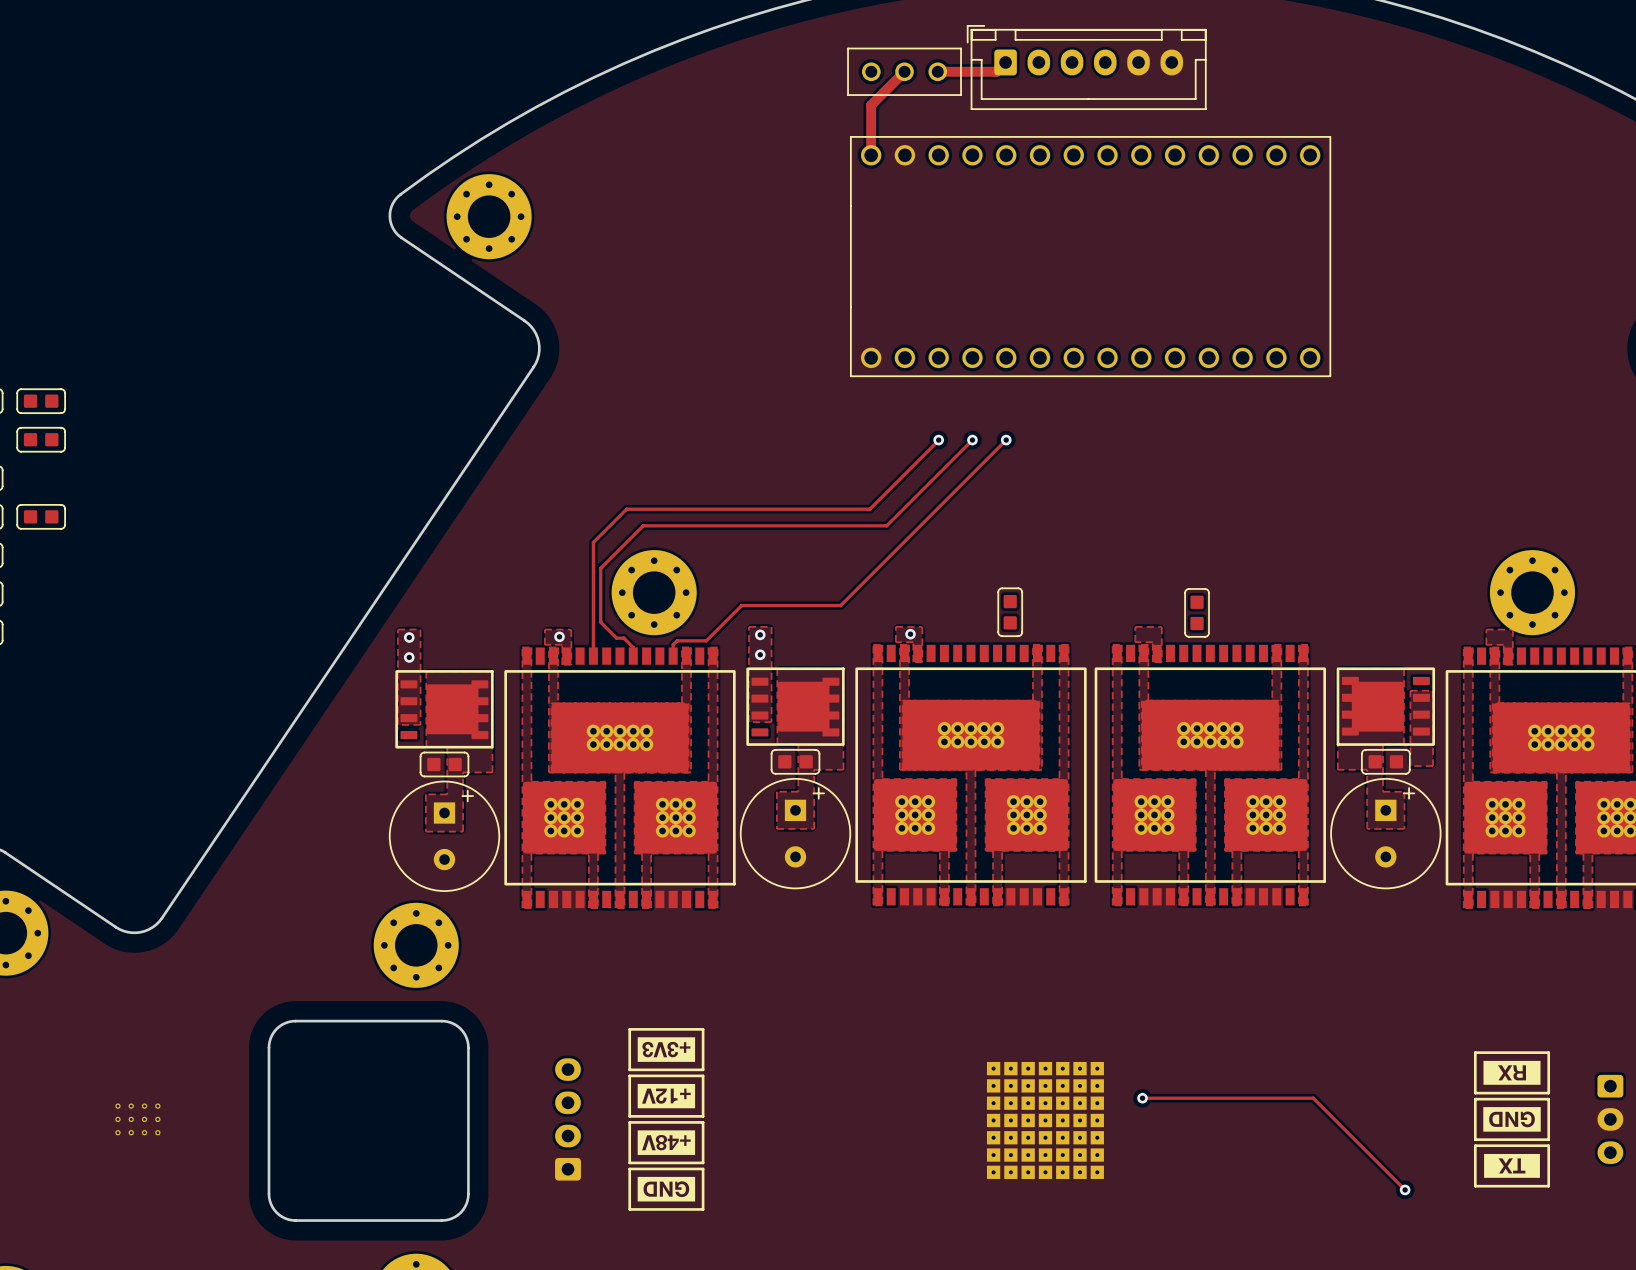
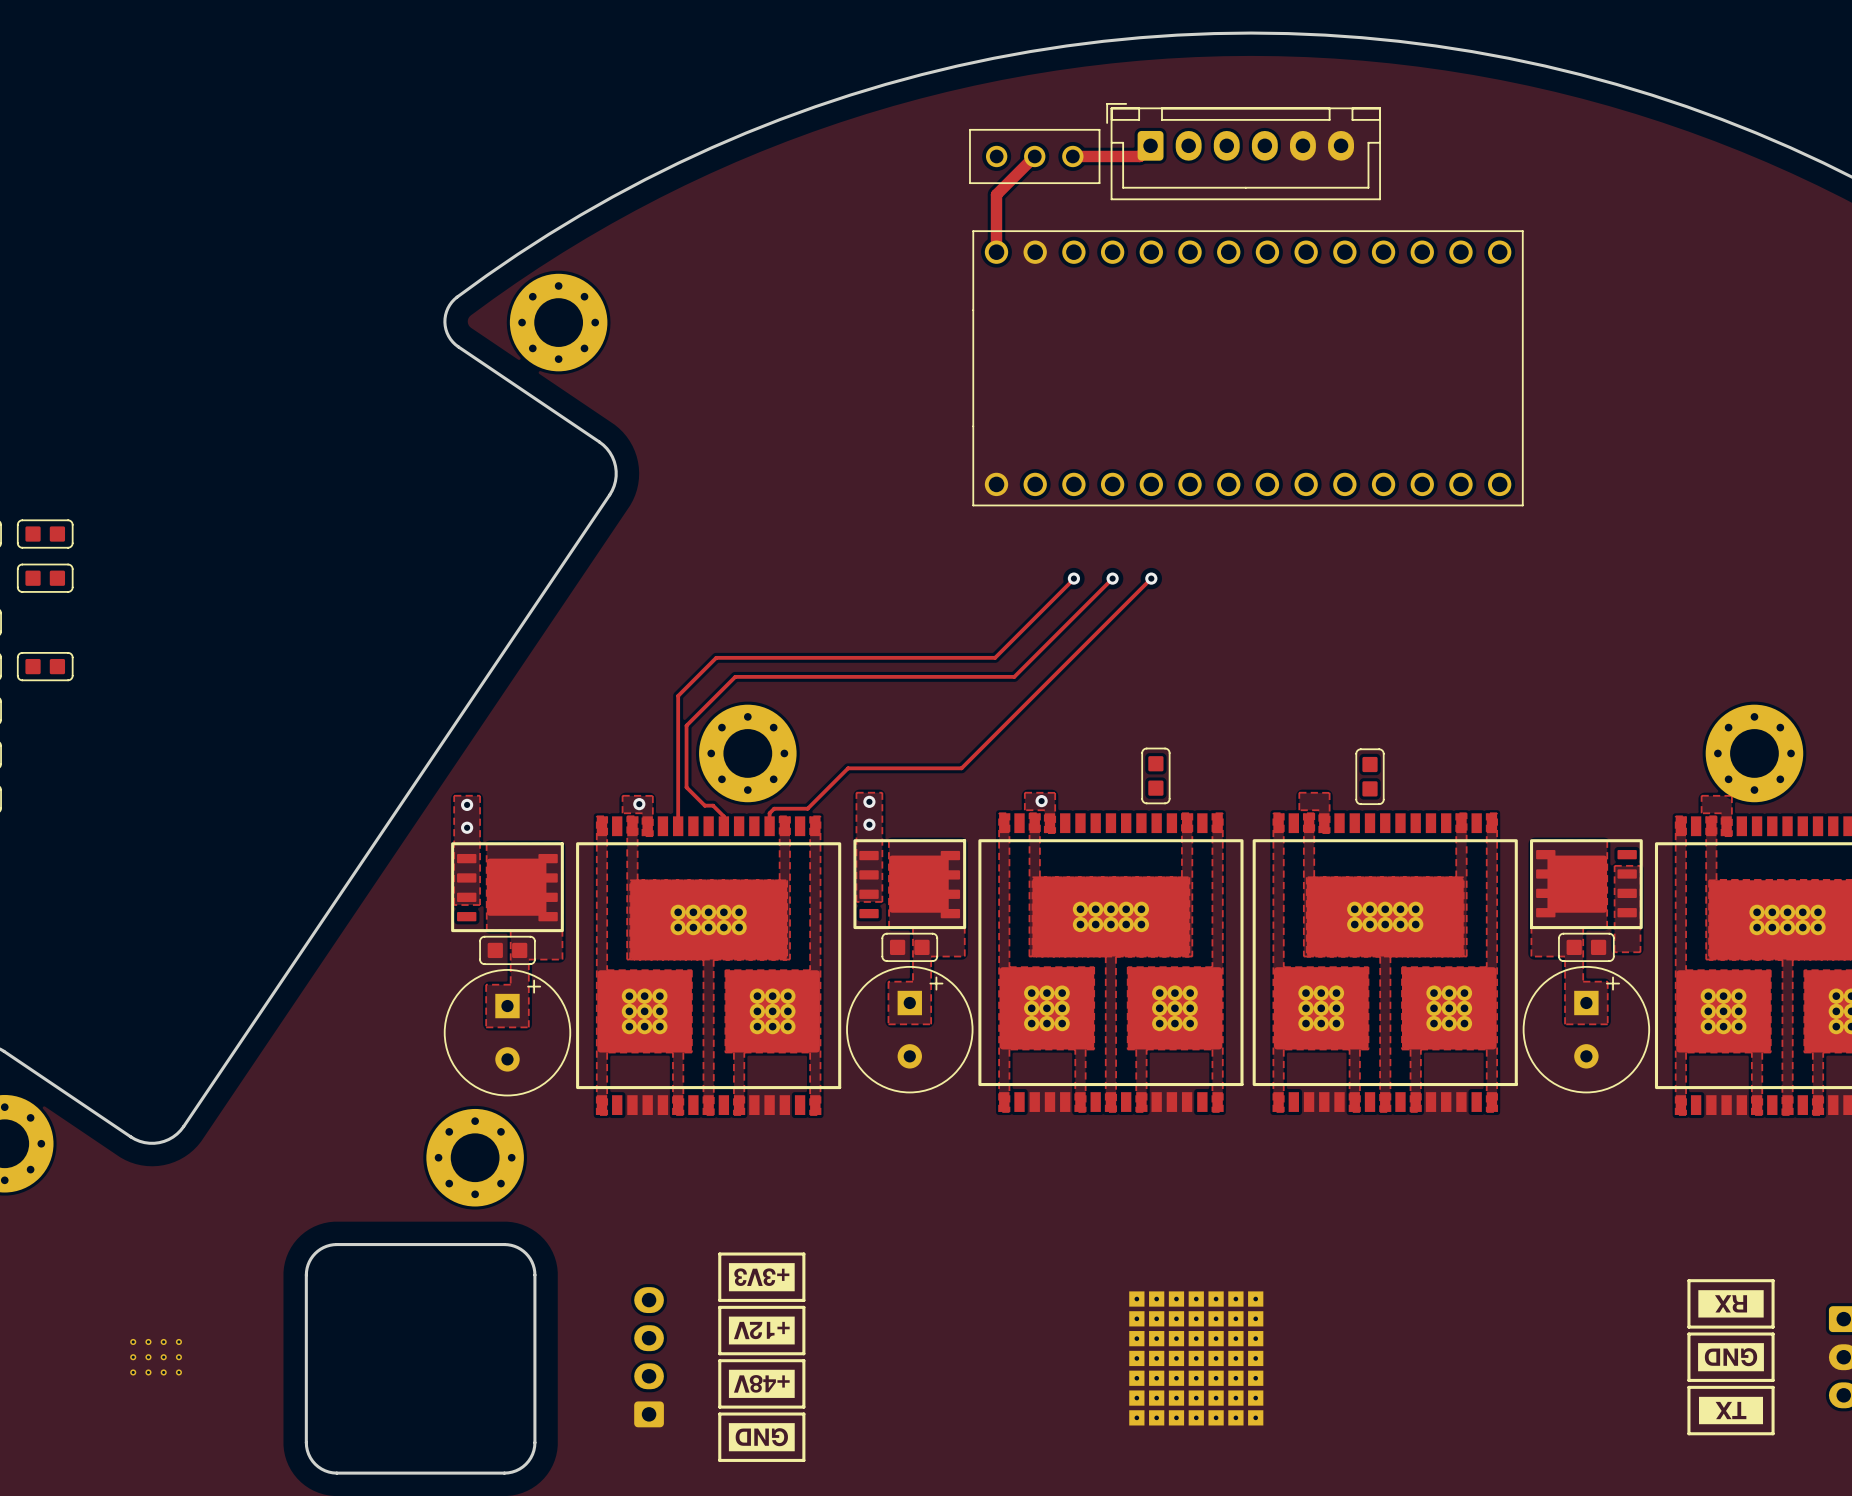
track: (1142, 1098) (1313, 1098) (1405, 1189) -> none
via: (1142, 1098) -> none
via: (1405, 1189) -> none

